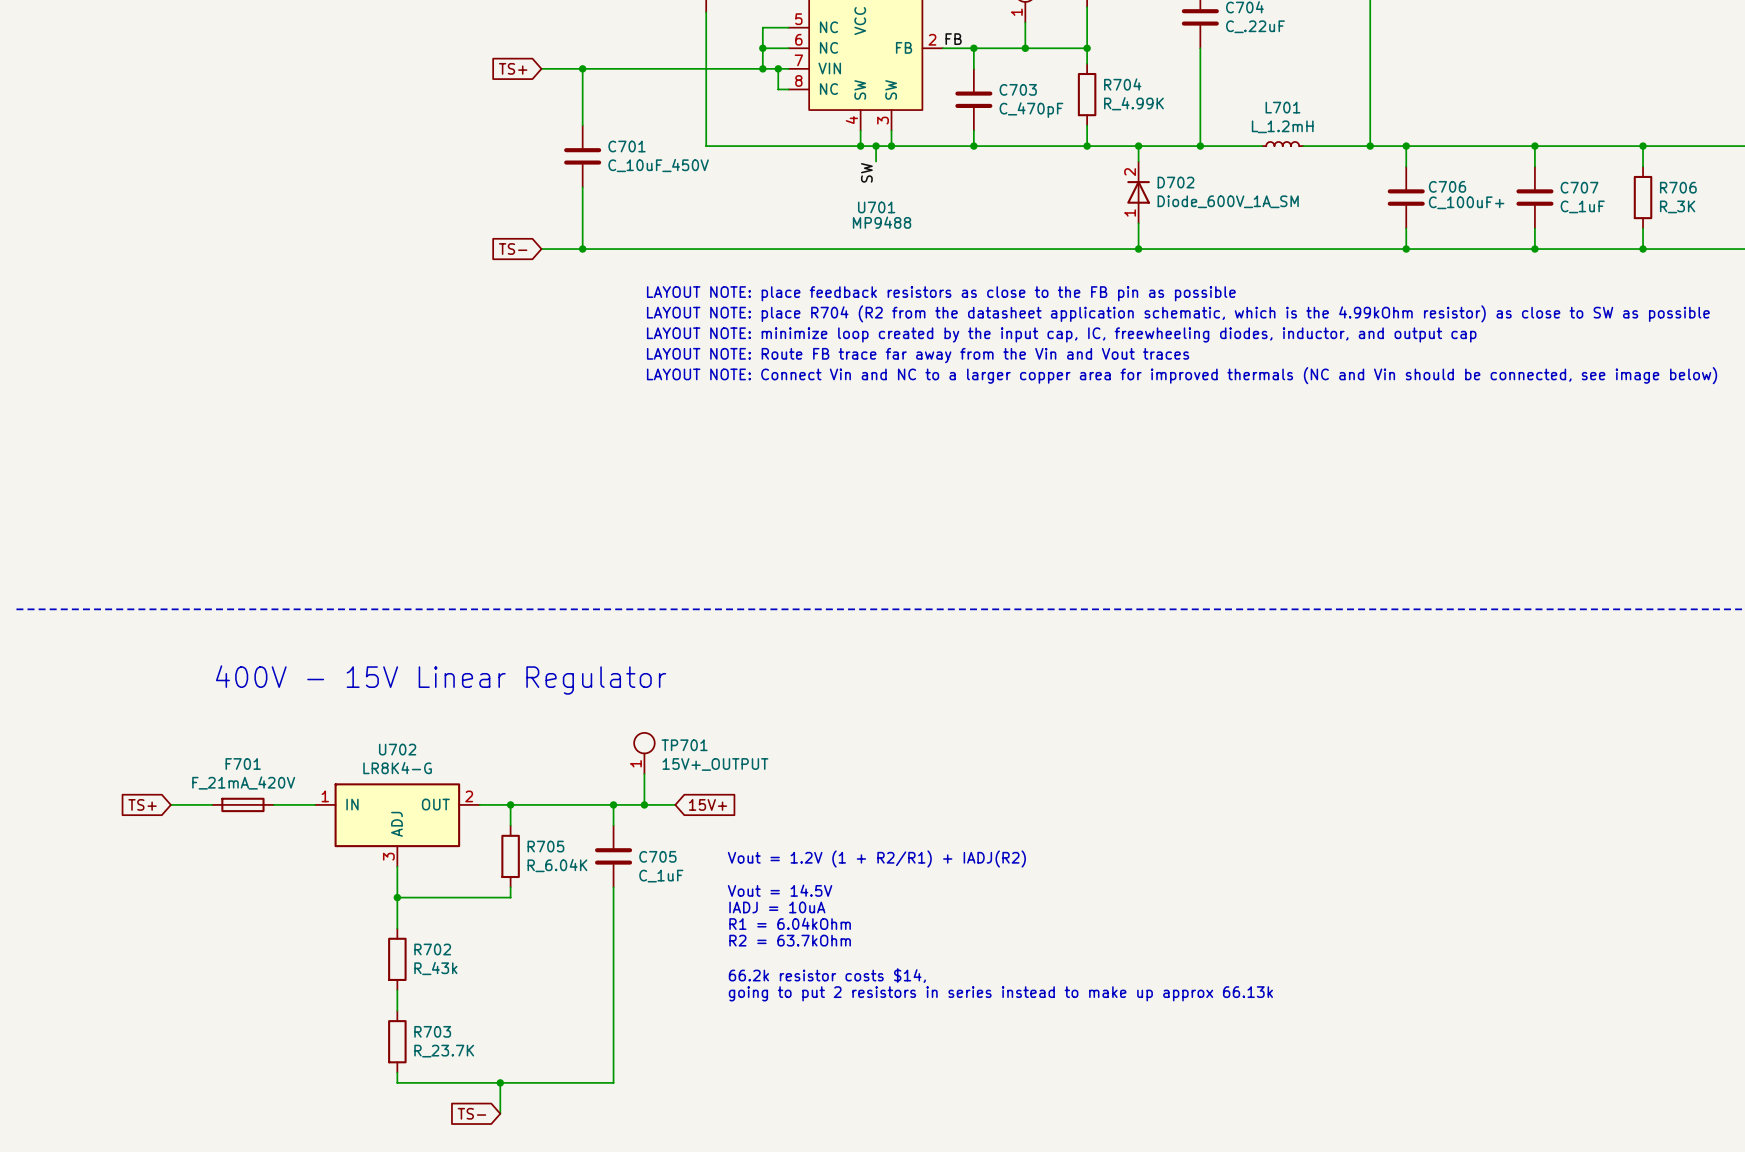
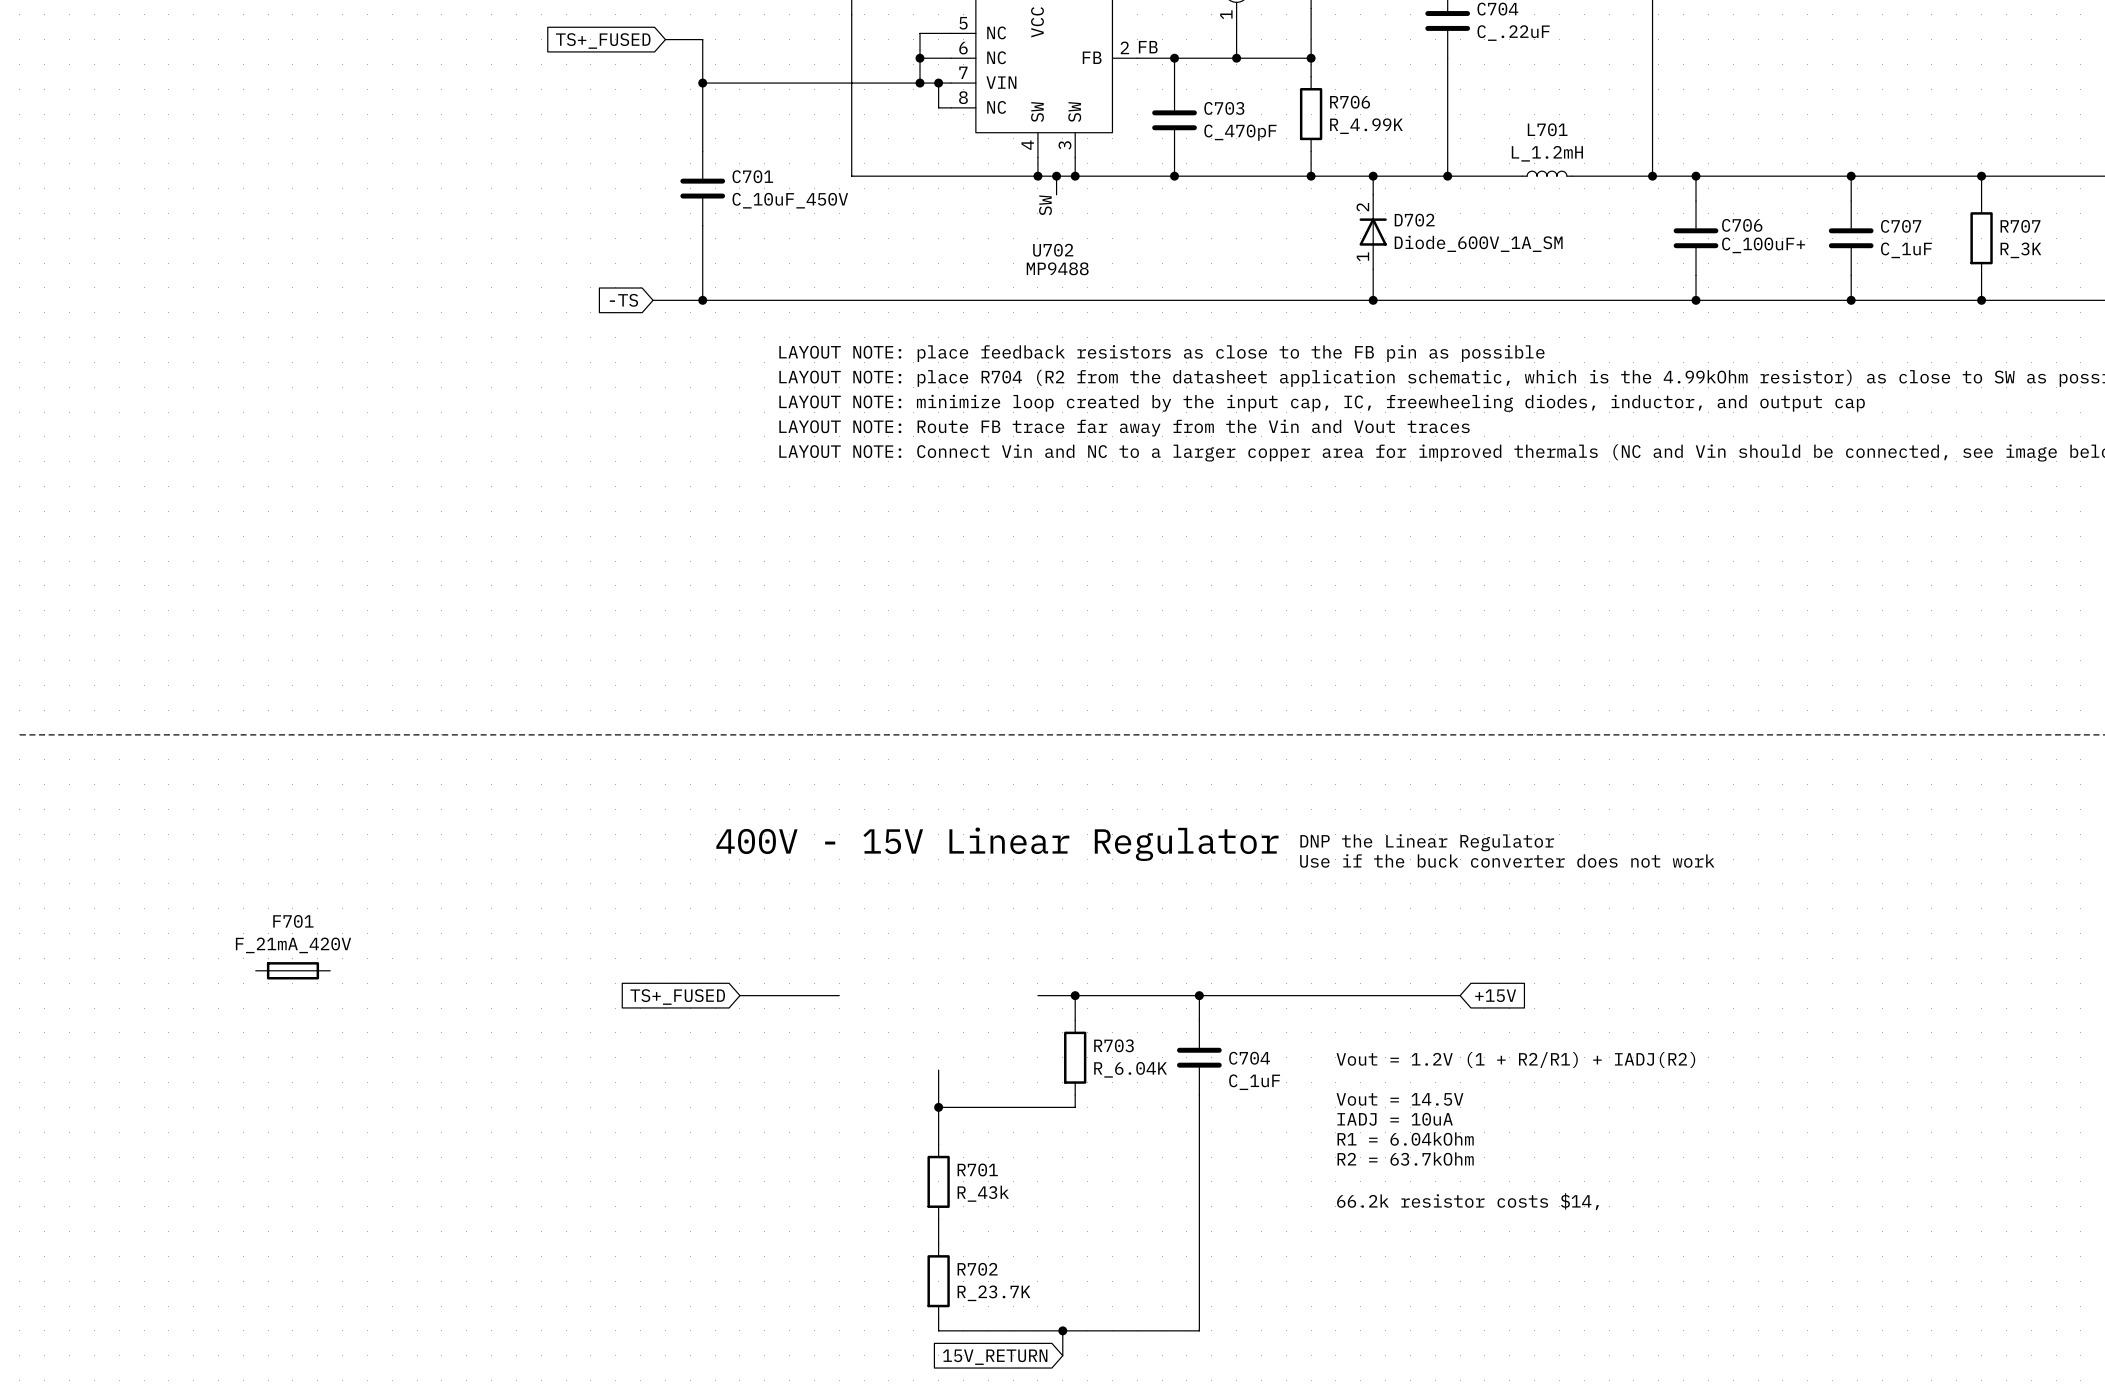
global label: none -> TS+_FUSED (603, 40)
global label: TS+ (513, 68) -> none
wire: (541, 68) (582, 68) -> (665, 39) (702, 39) (702, 83)
R704 name: R704 (1122, 84) -> R706 (1350, 102)
R706 name: R706 (1678, 187) -> R707 (2020, 226)
U701 name: U701 (876, 207) -> U702 (1053, 250)
global label: TS- (513, 249) -> -TS (623, 300)
text: 400V - 15V Linear Regulator (441, 679) -> none
text: none -> DNP the Linear Regulator (1427, 842)
text: none -> 400V - 15V Linear Regulator (997, 844)
text: none -> Use if the buck converter does not work (1507, 860)
TP701: 15V+_OUTPUT (644, 753) -> none
wire: (644, 774) (644, 804) -> none
global label: TS+ (142, 804) -> none
wire: (170, 804) (212, 804) -> none
wire: (273, 804) (315, 804) -> none
wire: (479, 804) (675, 804) -> none
wire: (510, 804) (510, 825) -> none
junction: (510, 804) -> none
wire: (613, 804) (613, 825) -> (839, 995) (739, 995)
junction: (613, 804) -> none
junction: (644, 804) -> none
global label: 15V+ (708, 804) -> none
U702: LR8K4-G (397, 825) -> none
wire: none -> (1037, 995) (1460, 995)
wire: none -> (1075, 995) (1075, 1020)
junction: none -> (1075, 995)
wire: none -> (1199, 995) (1199, 1020)
junction: none -> (1199, 995)
global label: none -> +15V (1495, 995)
global label: none -> TS+_FUSED (677, 997)
R705: R_6.04K (510, 856) -> none
C705: C_1uF (613, 856) -> none
text: Vout = 1.2V (1 + R2/R1) + IADJ(R2) (876, 858) -> none
wire: (397, 866) (397, 928) -> none
C704: none -> C_1uF (1199, 1057)
text: none -> Vout = 1.2V (1 + R2/R1) + IADJ(R2) (1515, 1060)
wire: (510, 887) (510, 897) (397, 897) -> none
wire: (613, 887) (613, 1082) (397, 1082) (397, 1072) -> none
wire: none -> (938, 1070) (938, 1144)
text: Vout = 14.5V (780, 890) -> none
junction: (397, 897) -> none
text: IADJ = 10uA (777, 907) -> none
wire: none -> (1075, 1094) (1075, 1107) (938, 1107)
wire: none -> (1199, 1094) (1199, 1330) (938, 1330) (938, 1318)
text: none -> Vout = 14.5V (1399, 1099)
junction: none -> (938, 1107)
text: R1 = 6.04kOhm (790, 923) -> none
text: none -> IADJ = 10uA (1395, 1119)
text: R2 = 63.7kOhm (790, 940) -> none
text: none -> R1 = 6.04kOhm (1405, 1139)
R702 position: (397, 959) -> (938, 1281)
text: none -> R2 = 63.7kOhm (1405, 1159)
R702 value: R_43k (435, 968) -> R_23.7K (993, 1293)
text: 66.2k resistor costs $14, (827, 975) -> none
R701: none -> R_43k (938, 1181)
wire: (397, 990) (397, 1010) -> none
text: going to put 2 resistors in series instead to make up approx 66.13k (1000, 993) -> none
text: none -> 66.2k resistor costs $14, (1468, 1201)
wire: none -> (938, 1219) (938, 1243)
R703 position: (397, 1041) -> (1075, 1057)
R703 value: R_23.7K (444, 1051) -> R_6.04K (1130, 1069)
wire: (500, 1082) (500, 1113) -> none
junction: (500, 1082) -> none
wire: none -> (1062, 1330) (1062, 1355)
junction: none -> (1062, 1330)
global label: TS- (471, 1113) -> none
global label: none -> 15V_RETURN (995, 1357)

